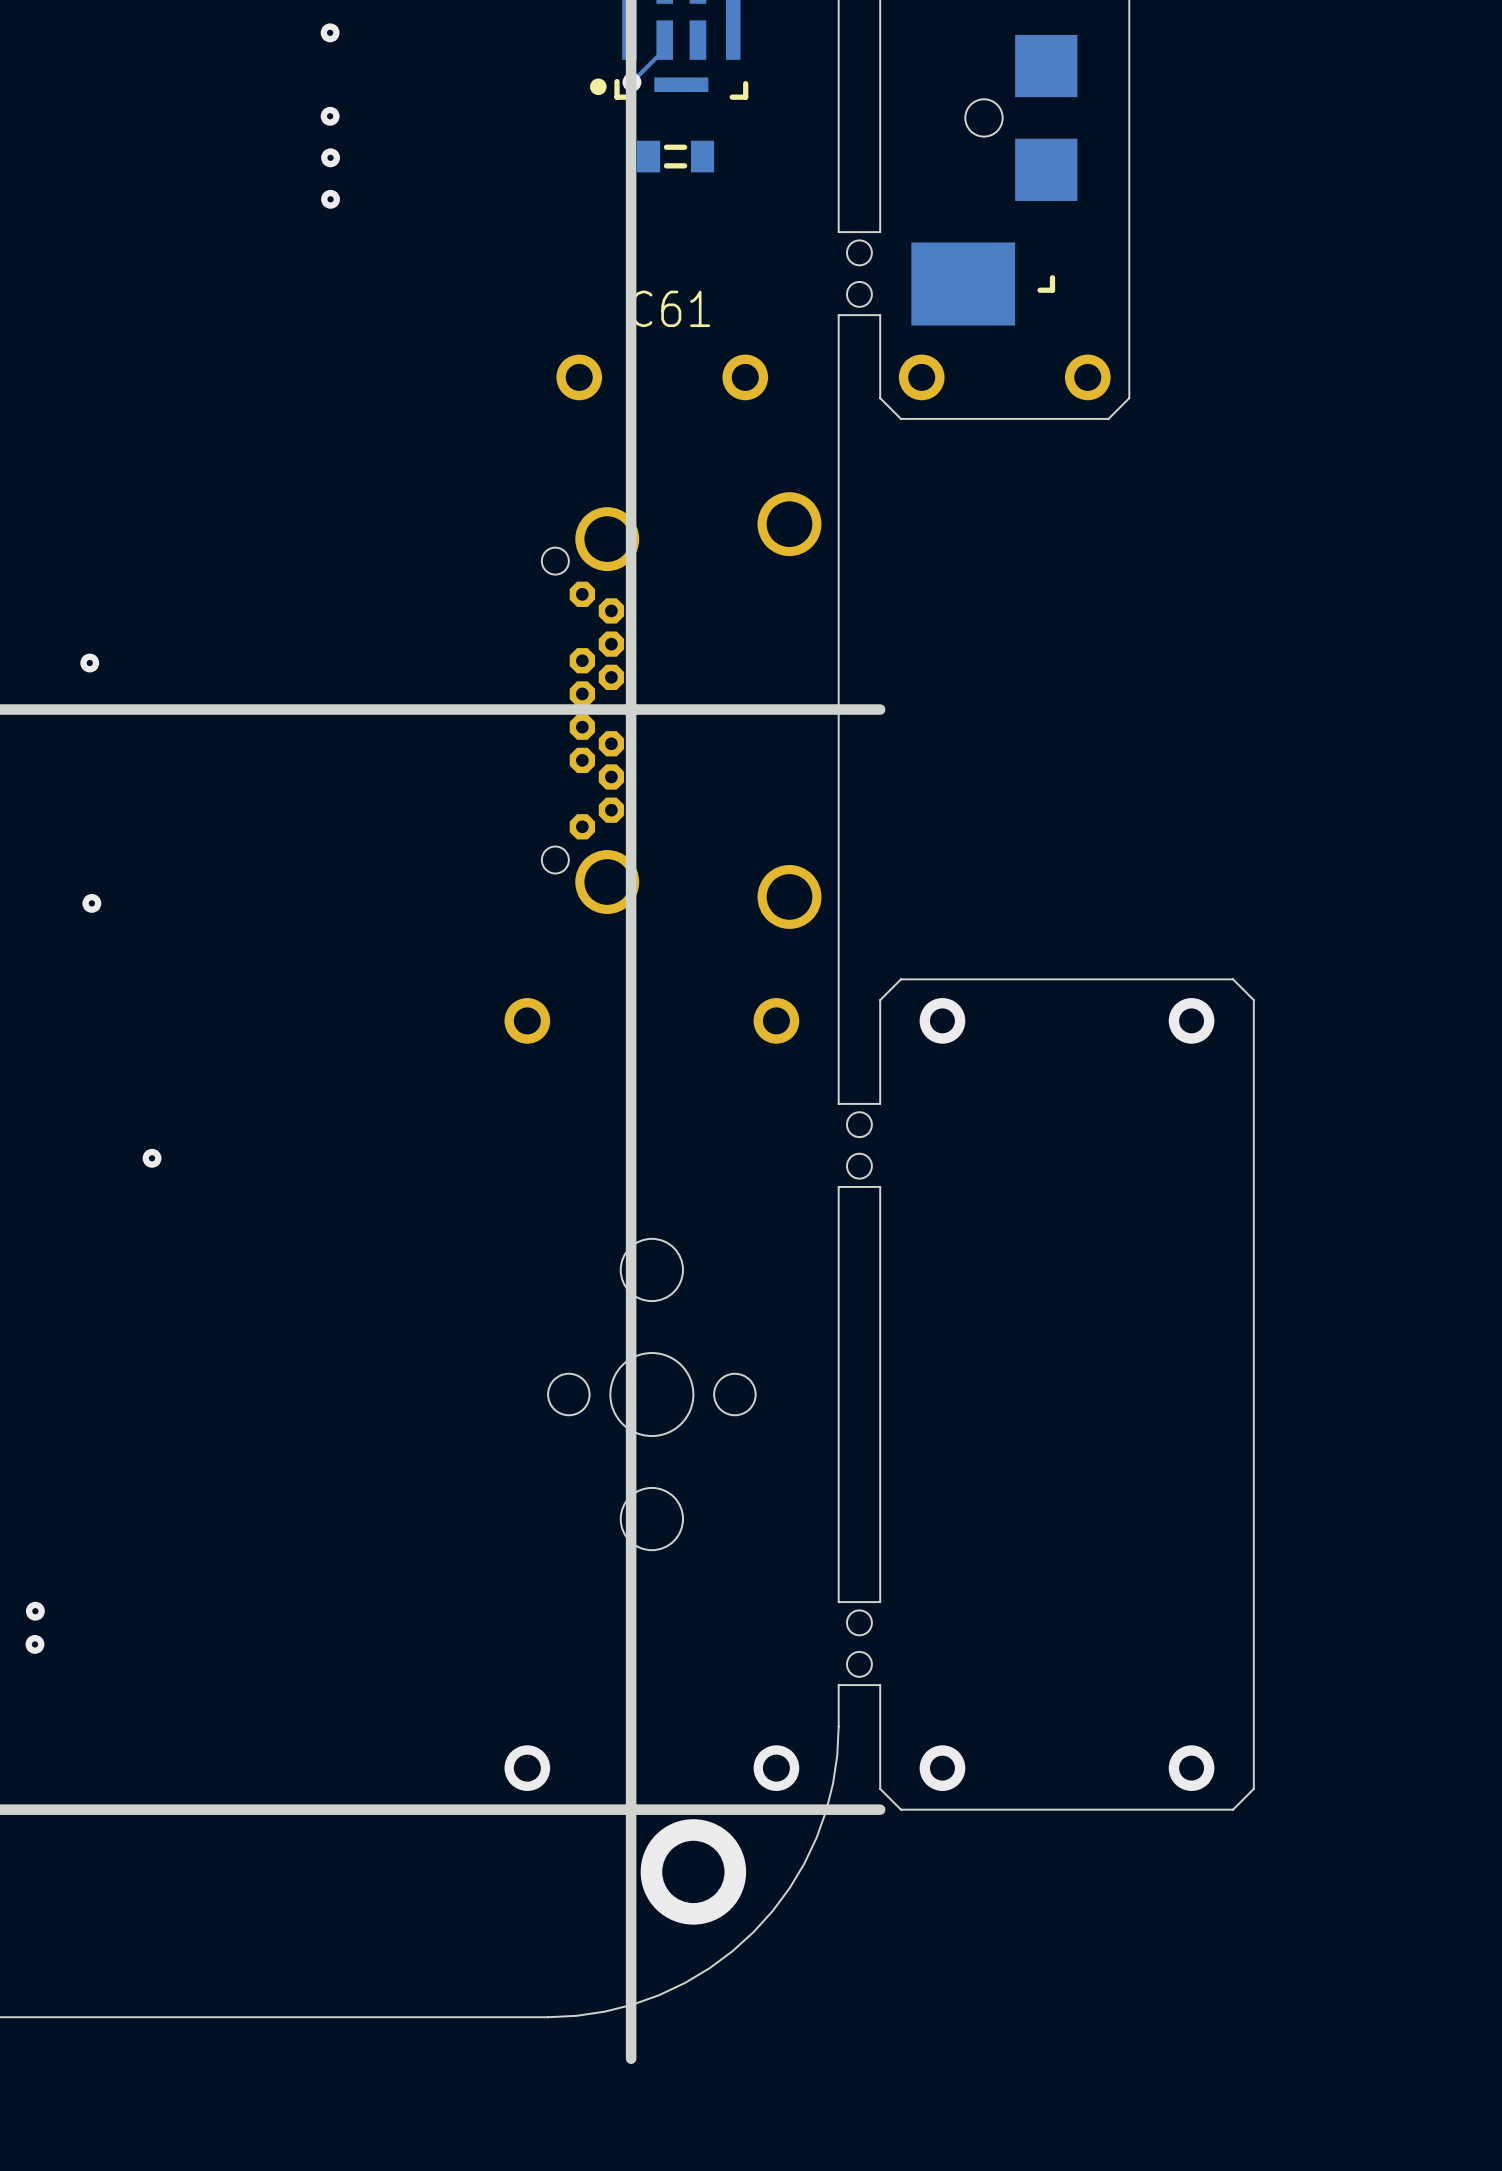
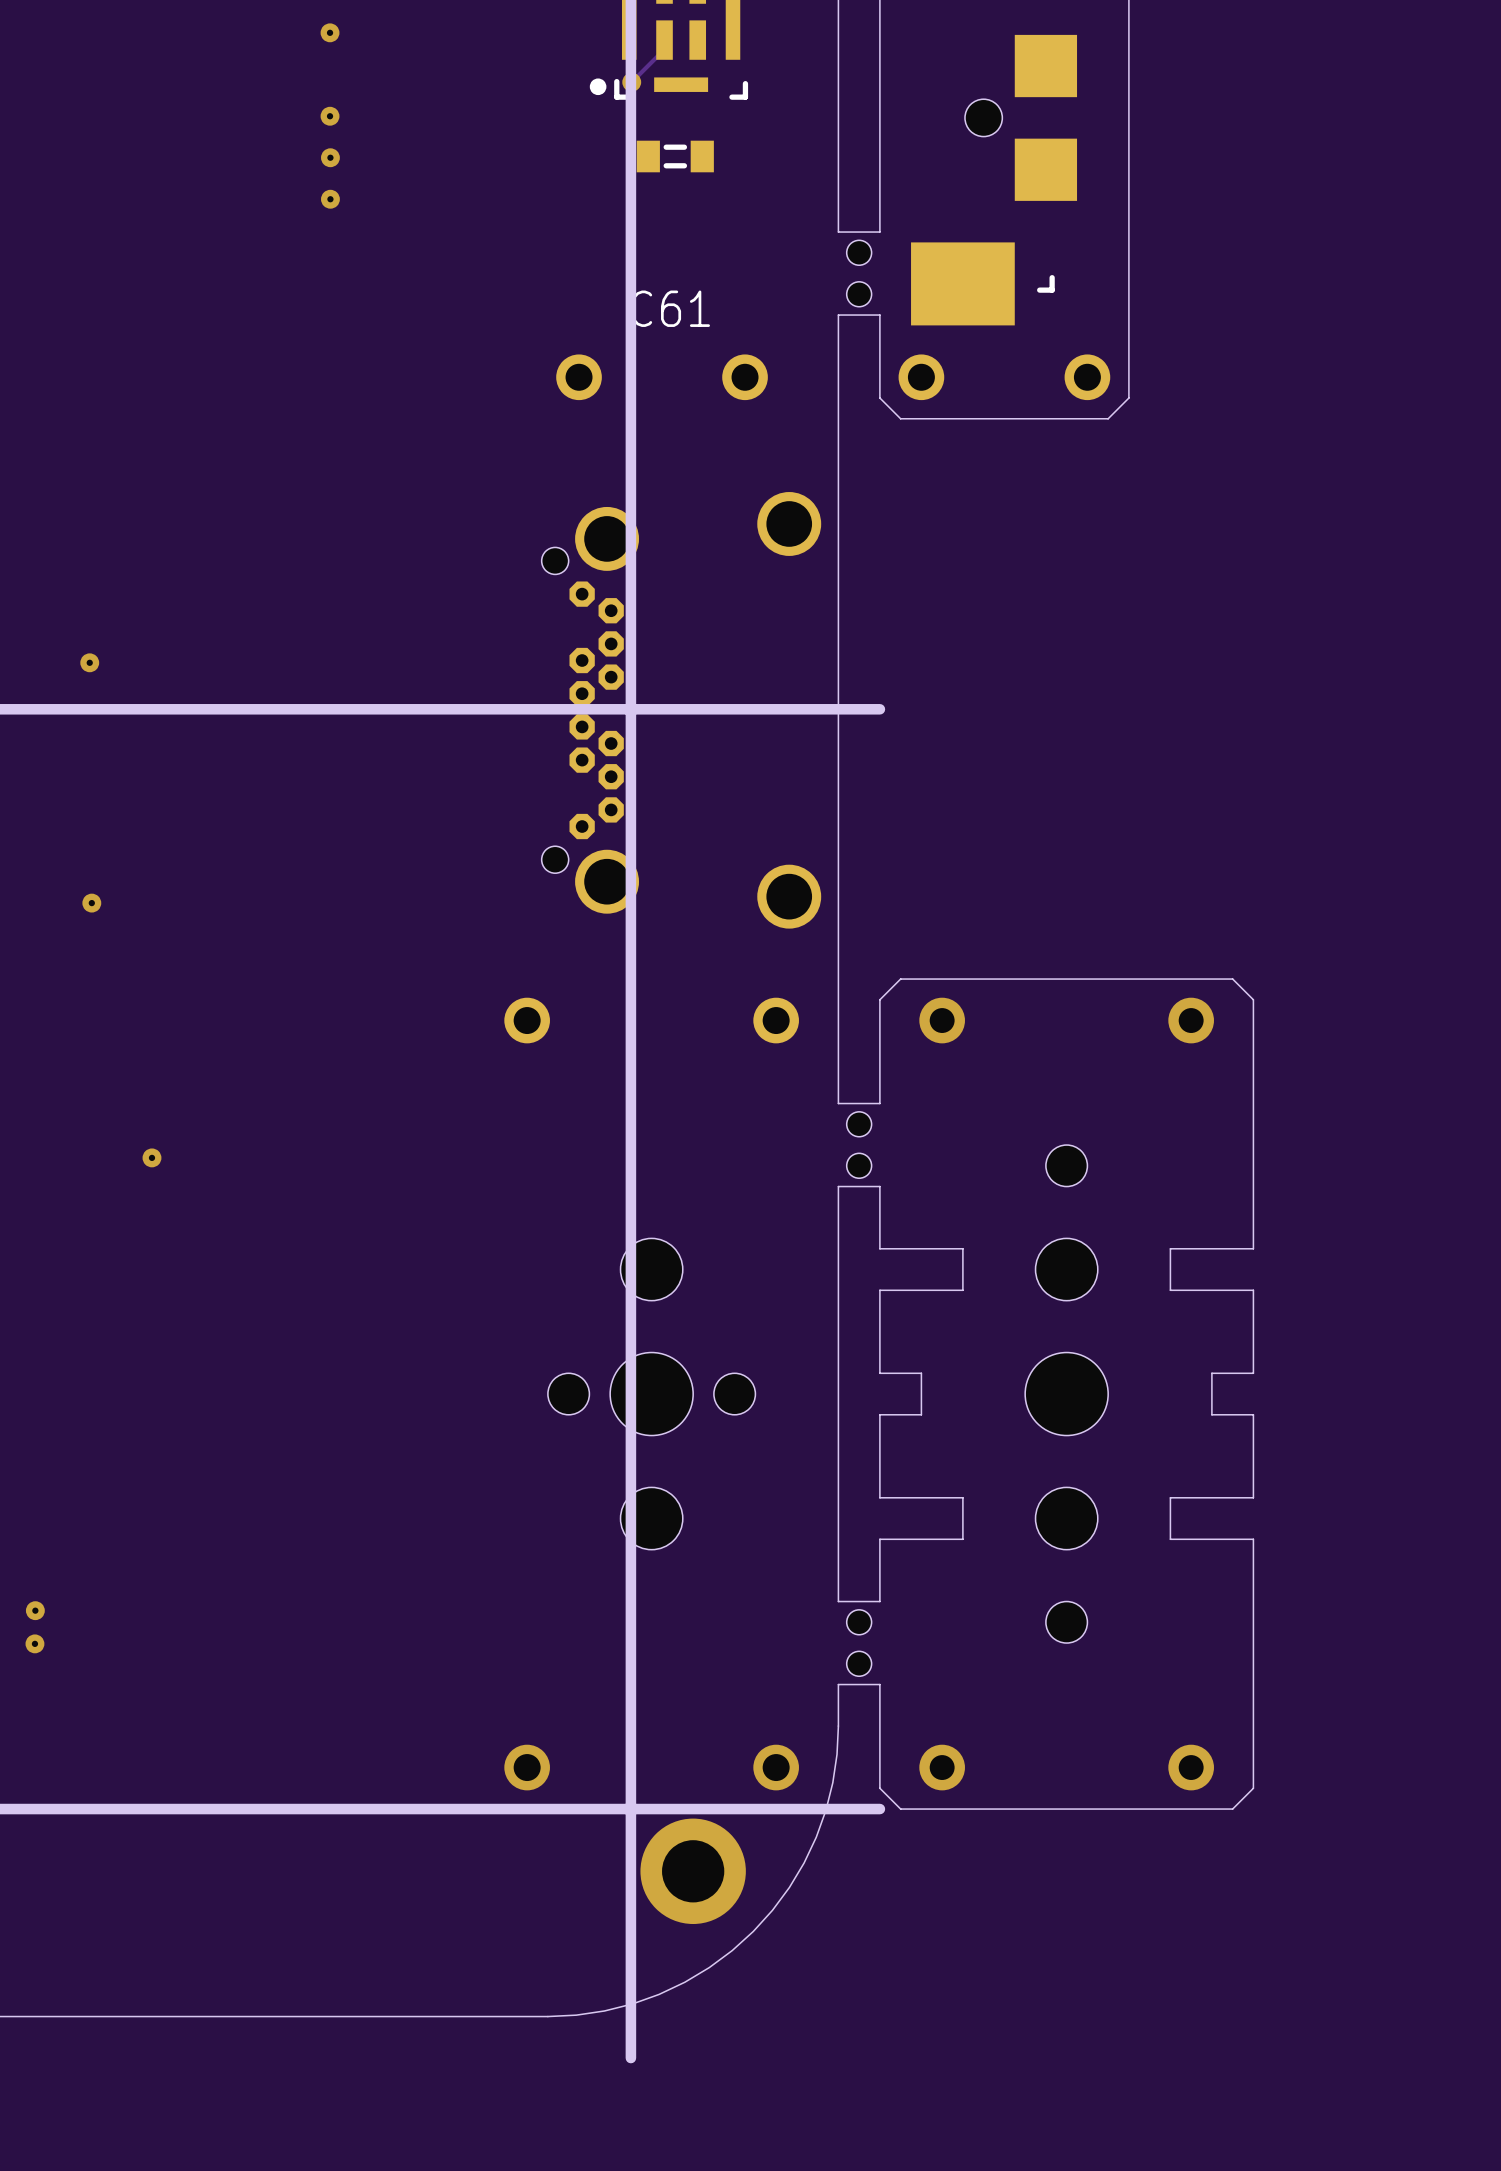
hole: none -> (1066, 1165)
board edge: (880, 1249) (880, 1290) -> (879, 1248) (962, 1248) (962, 1290) (879, 1290)
board edge: (1253, 1249) (1253, 1290) -> (1253, 1248) (1170, 1248) (1170, 1290) (1253, 1290)
hole: none -> (1066, 1269)
board edge: (880, 1373) (880, 1415) -> (879, 1373) (921, 1373) (921, 1414) (879, 1414)
board edge: (1253, 1373) (1253, 1415) -> (1253, 1373) (1211, 1373) (1211, 1414) (1253, 1414)
hole: none -> (1066, 1394)
board edge: (880, 1498) (880, 1539) -> (879, 1497) (962, 1497) (962, 1539) (879, 1539)
board edge: (1253, 1498) (1253, 1539) -> (1253, 1497) (1170, 1497) (1170, 1539) (1253, 1539)
hole: none -> (1066, 1518)
hole: none -> (1066, 1622)

